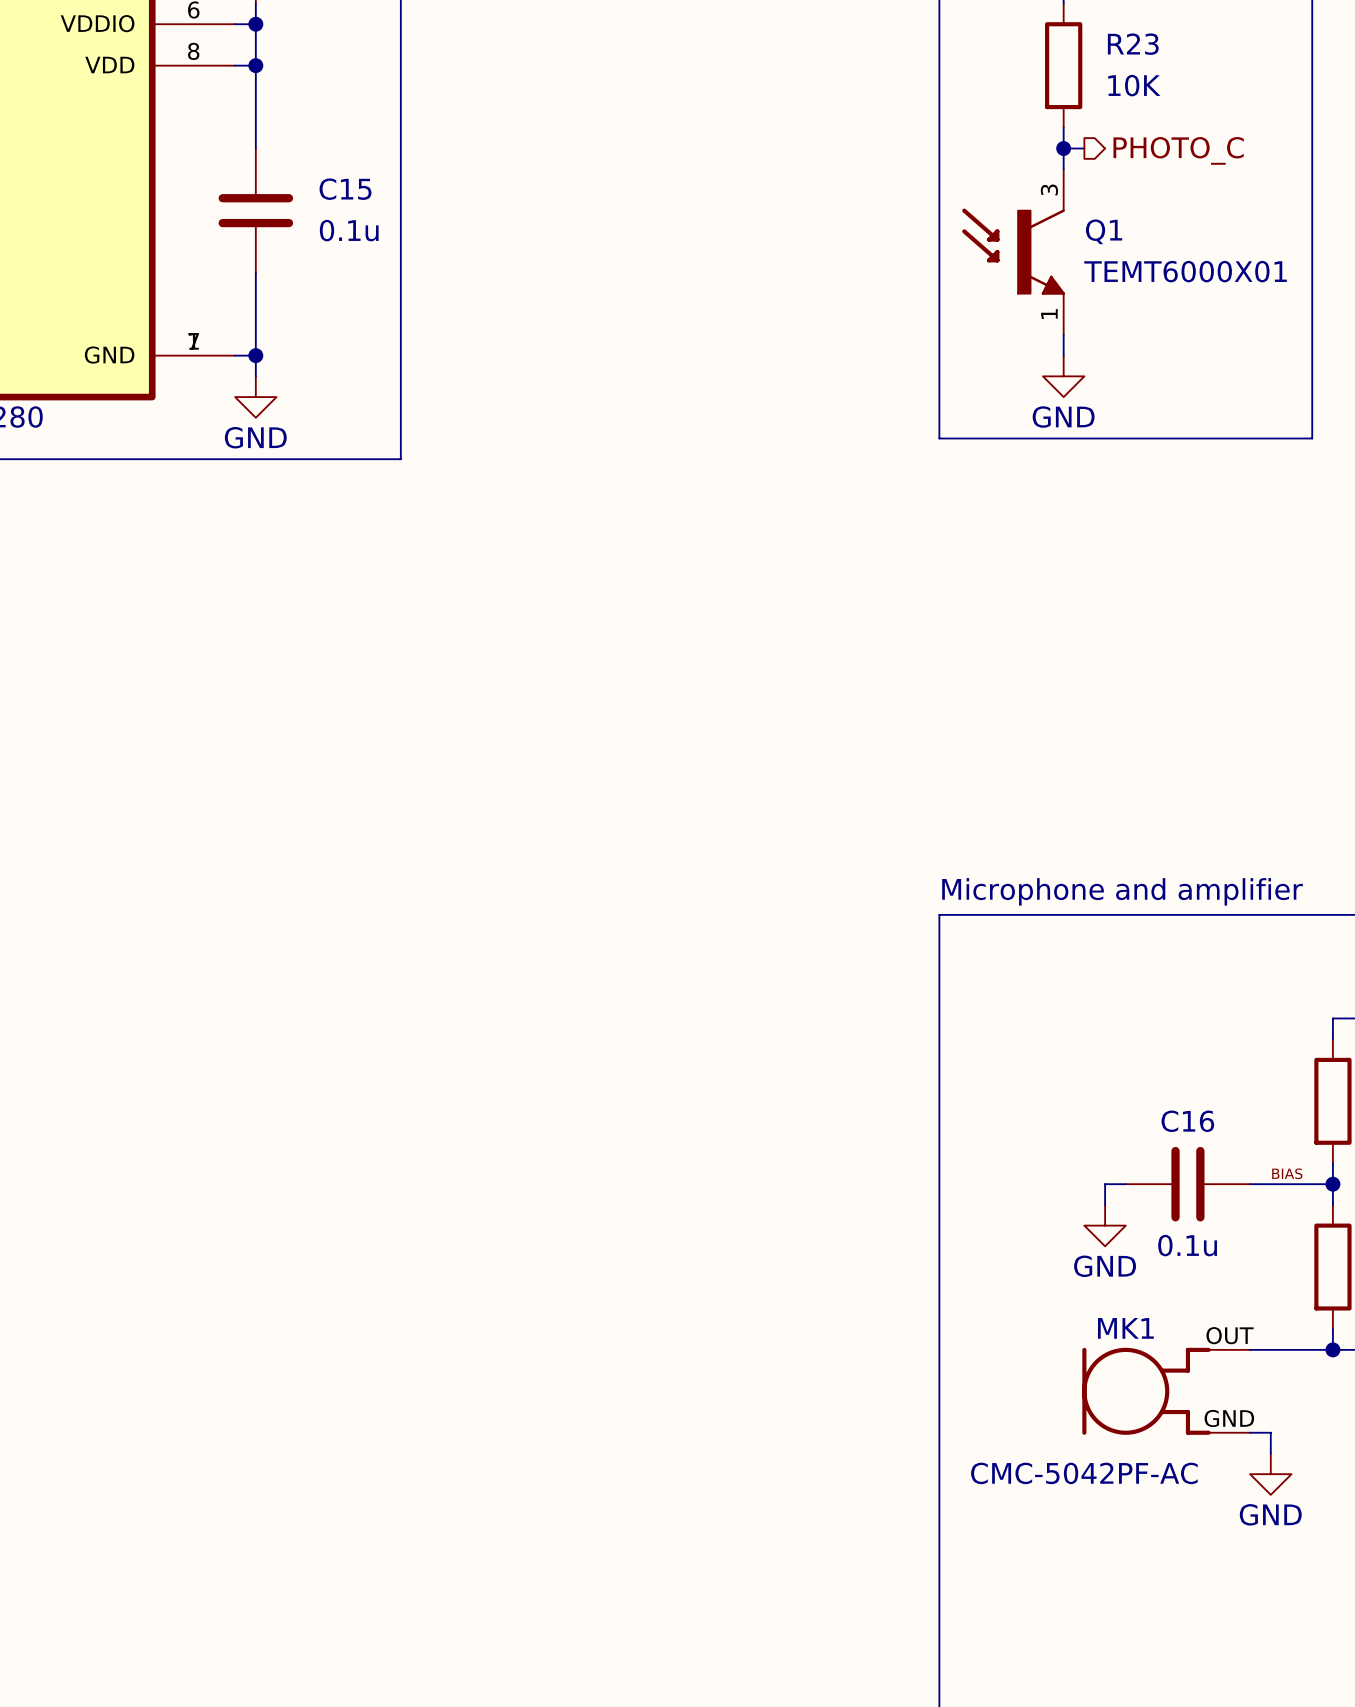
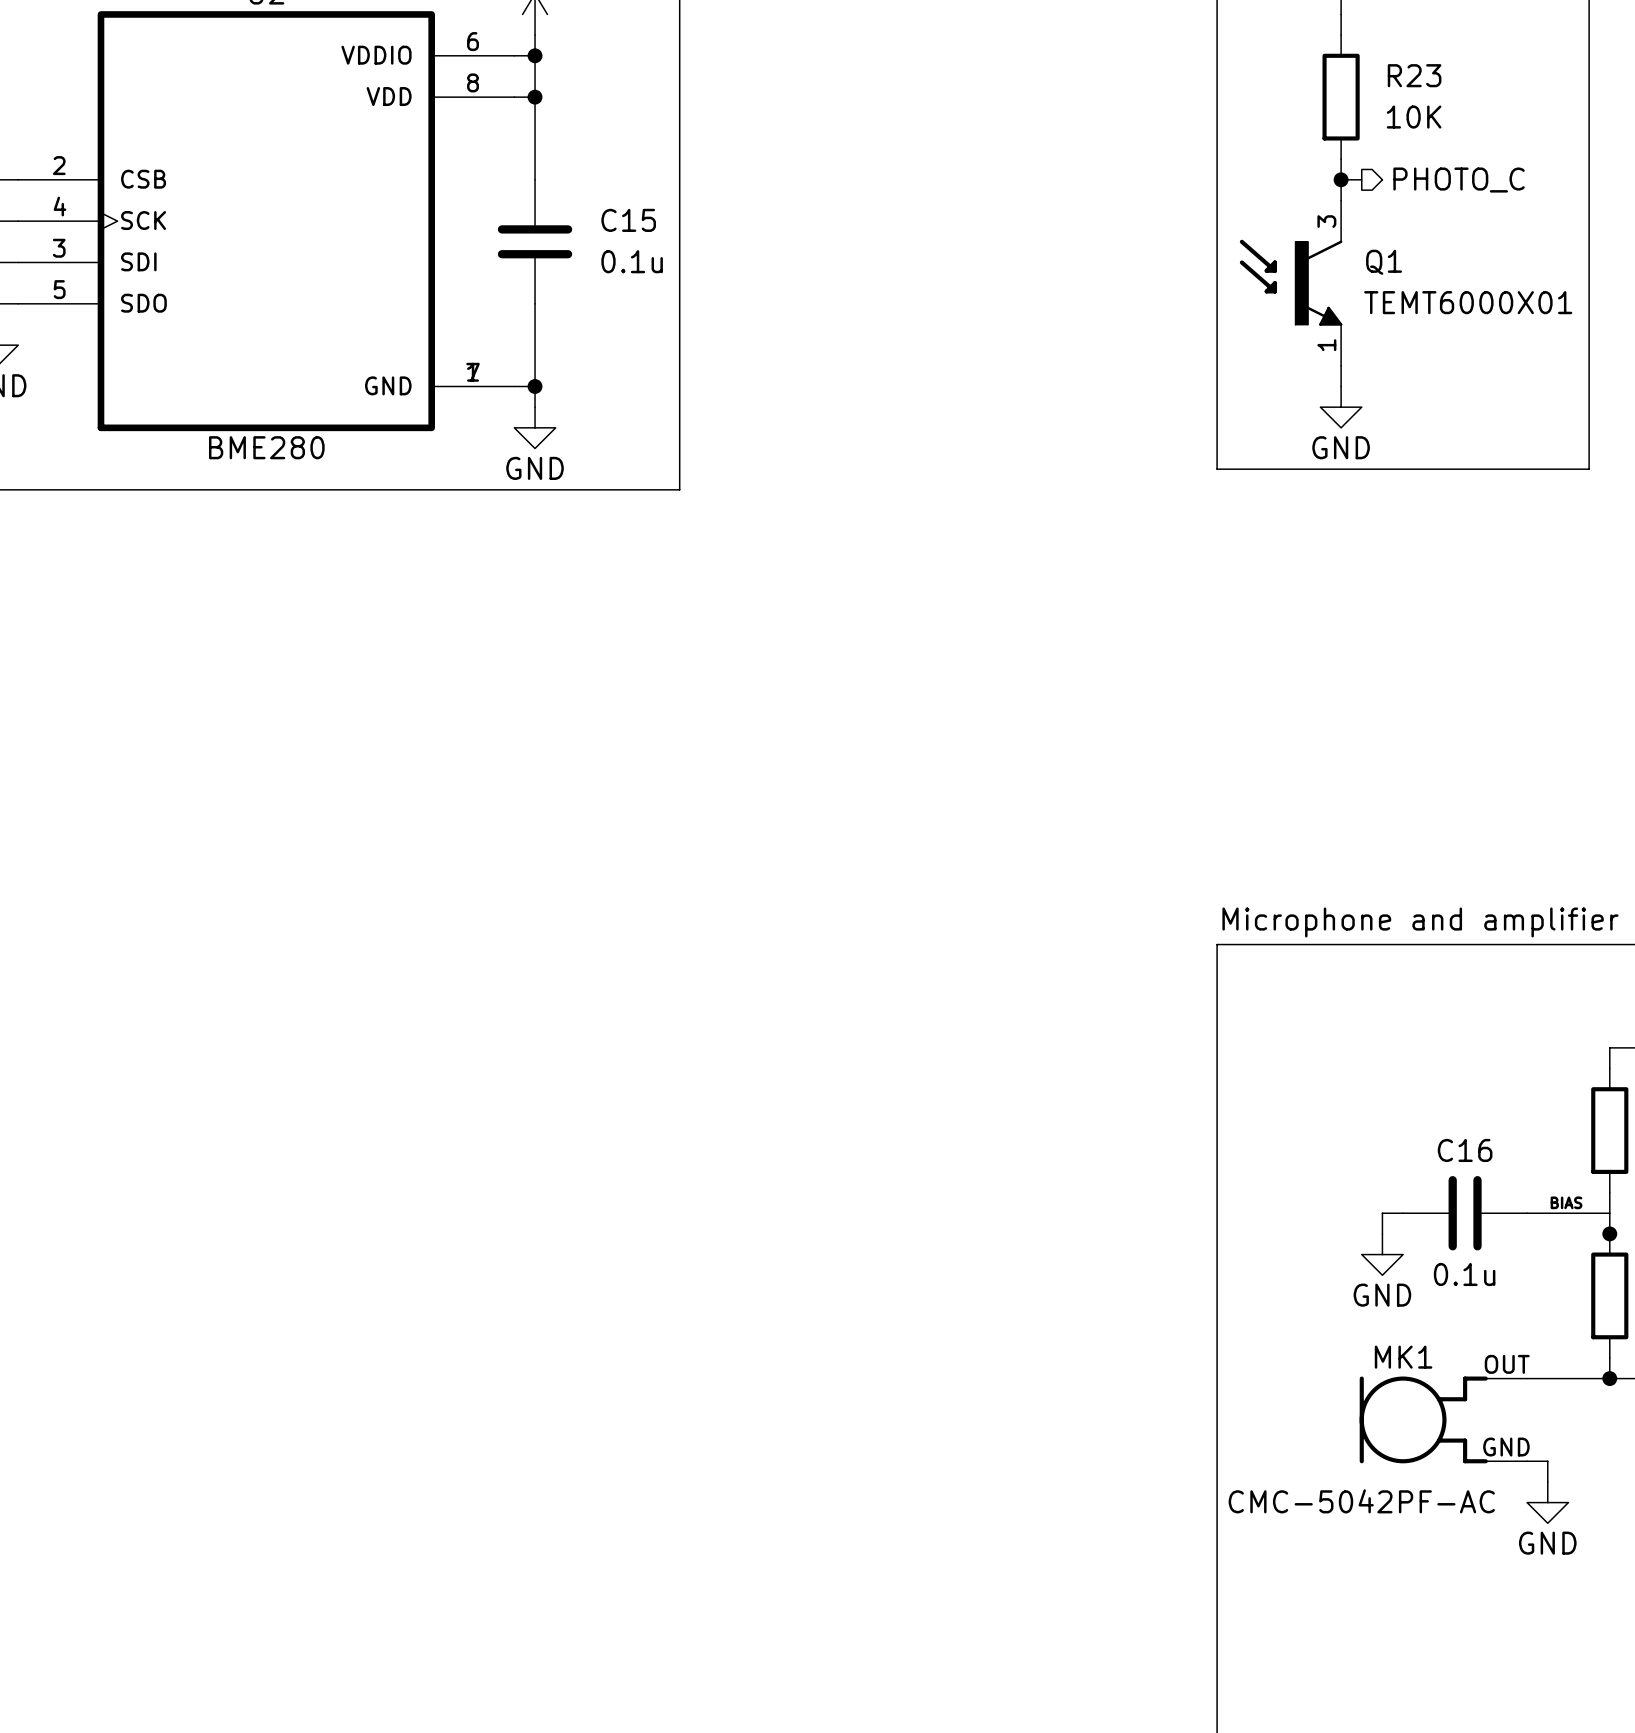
junction position: (1332, 1184) -> (1609, 1233)

